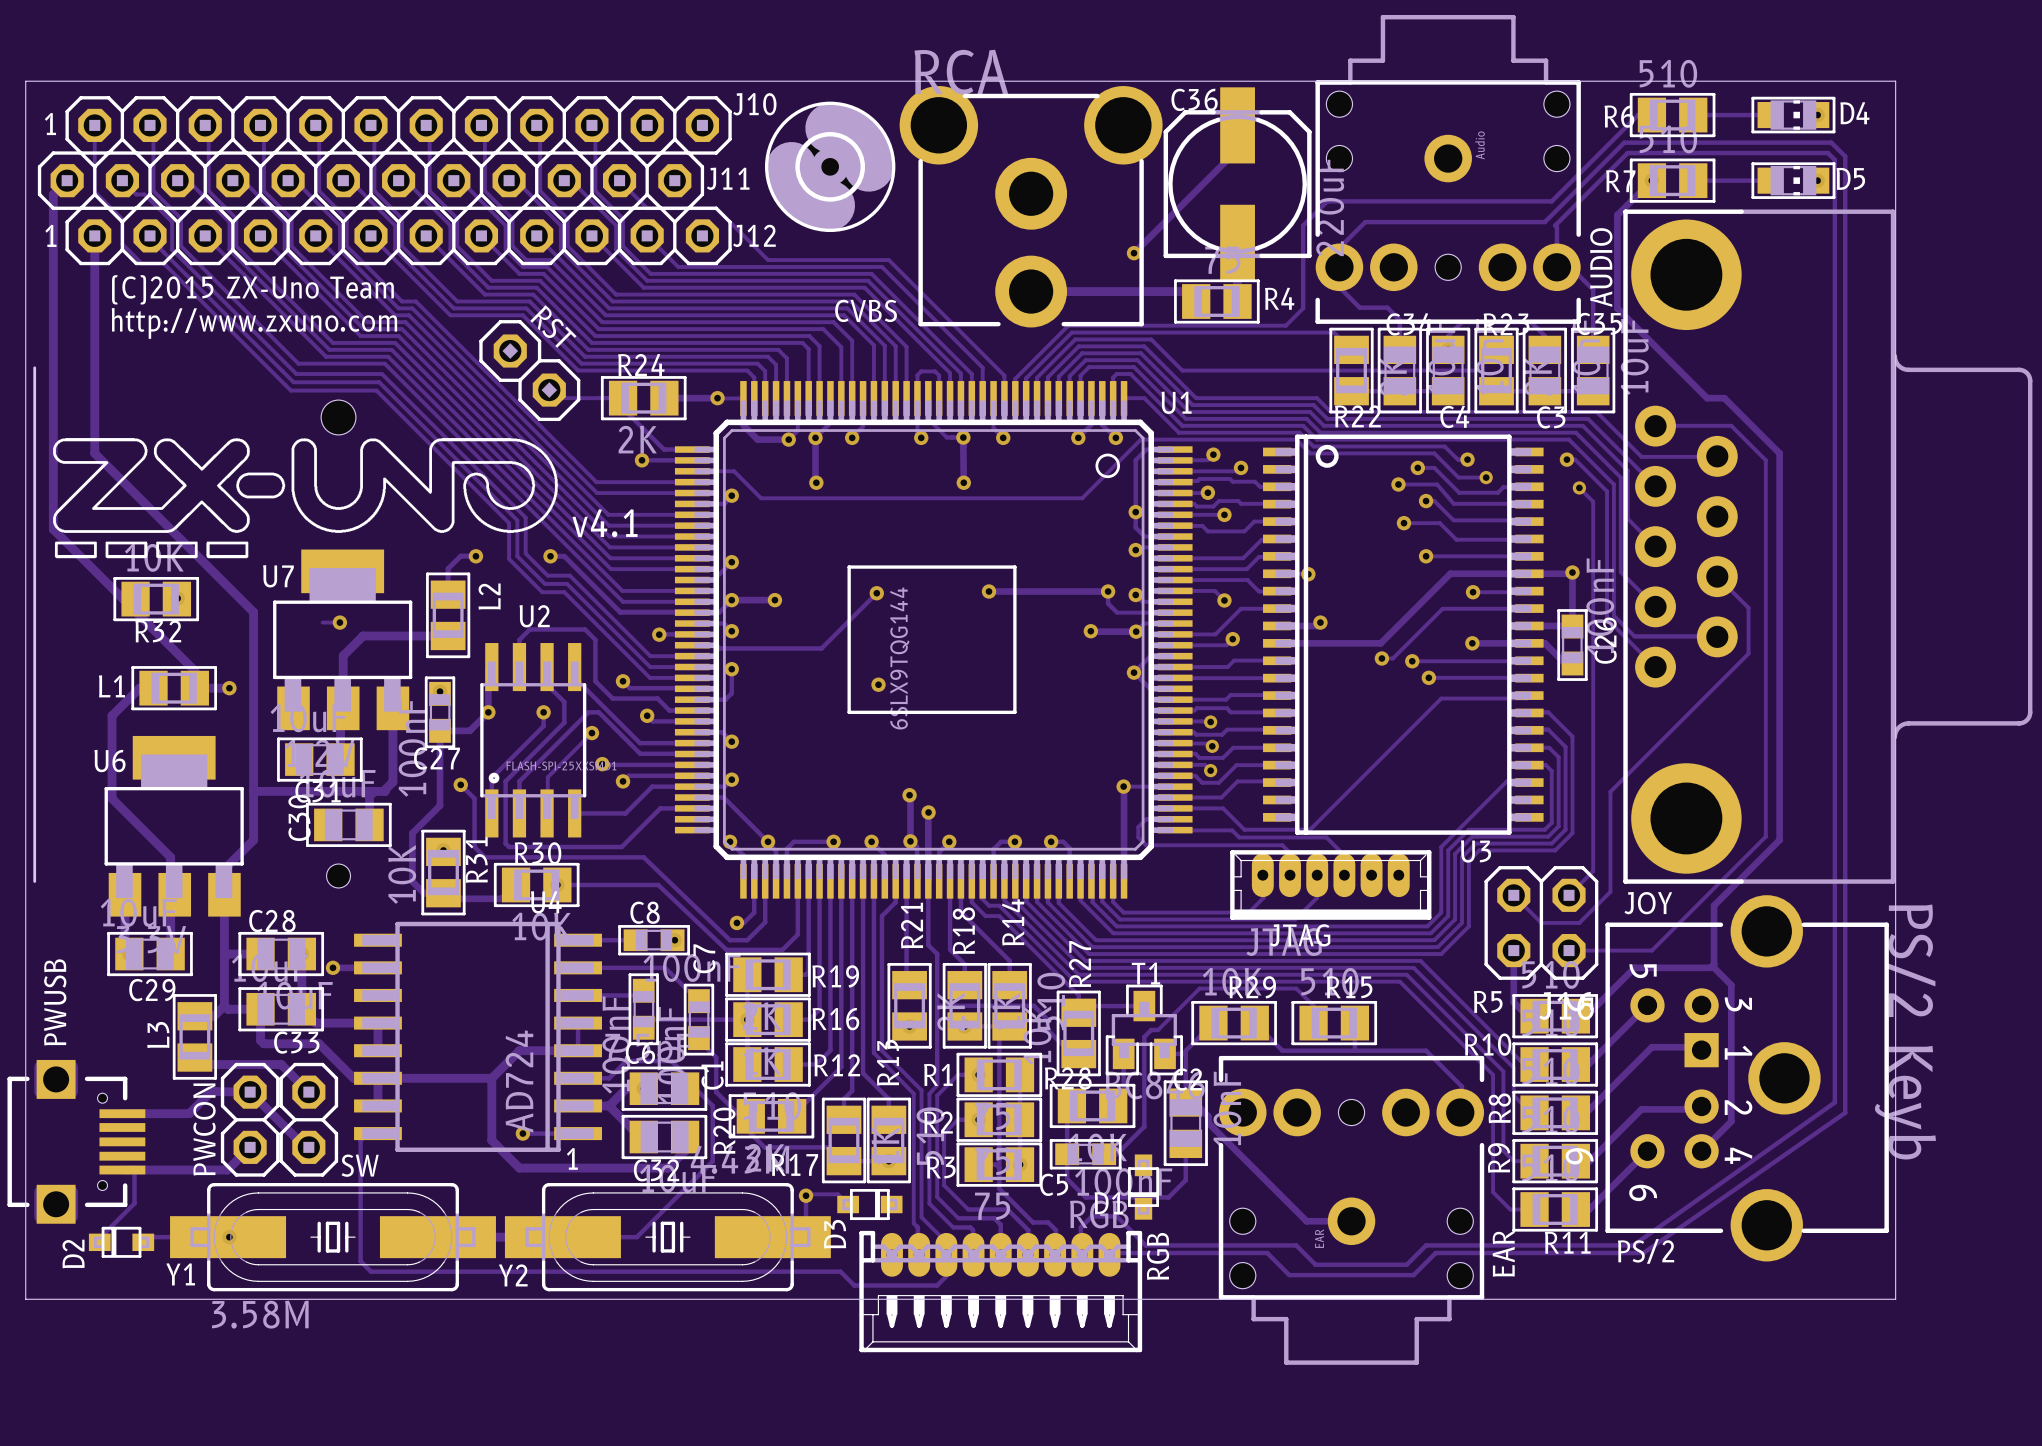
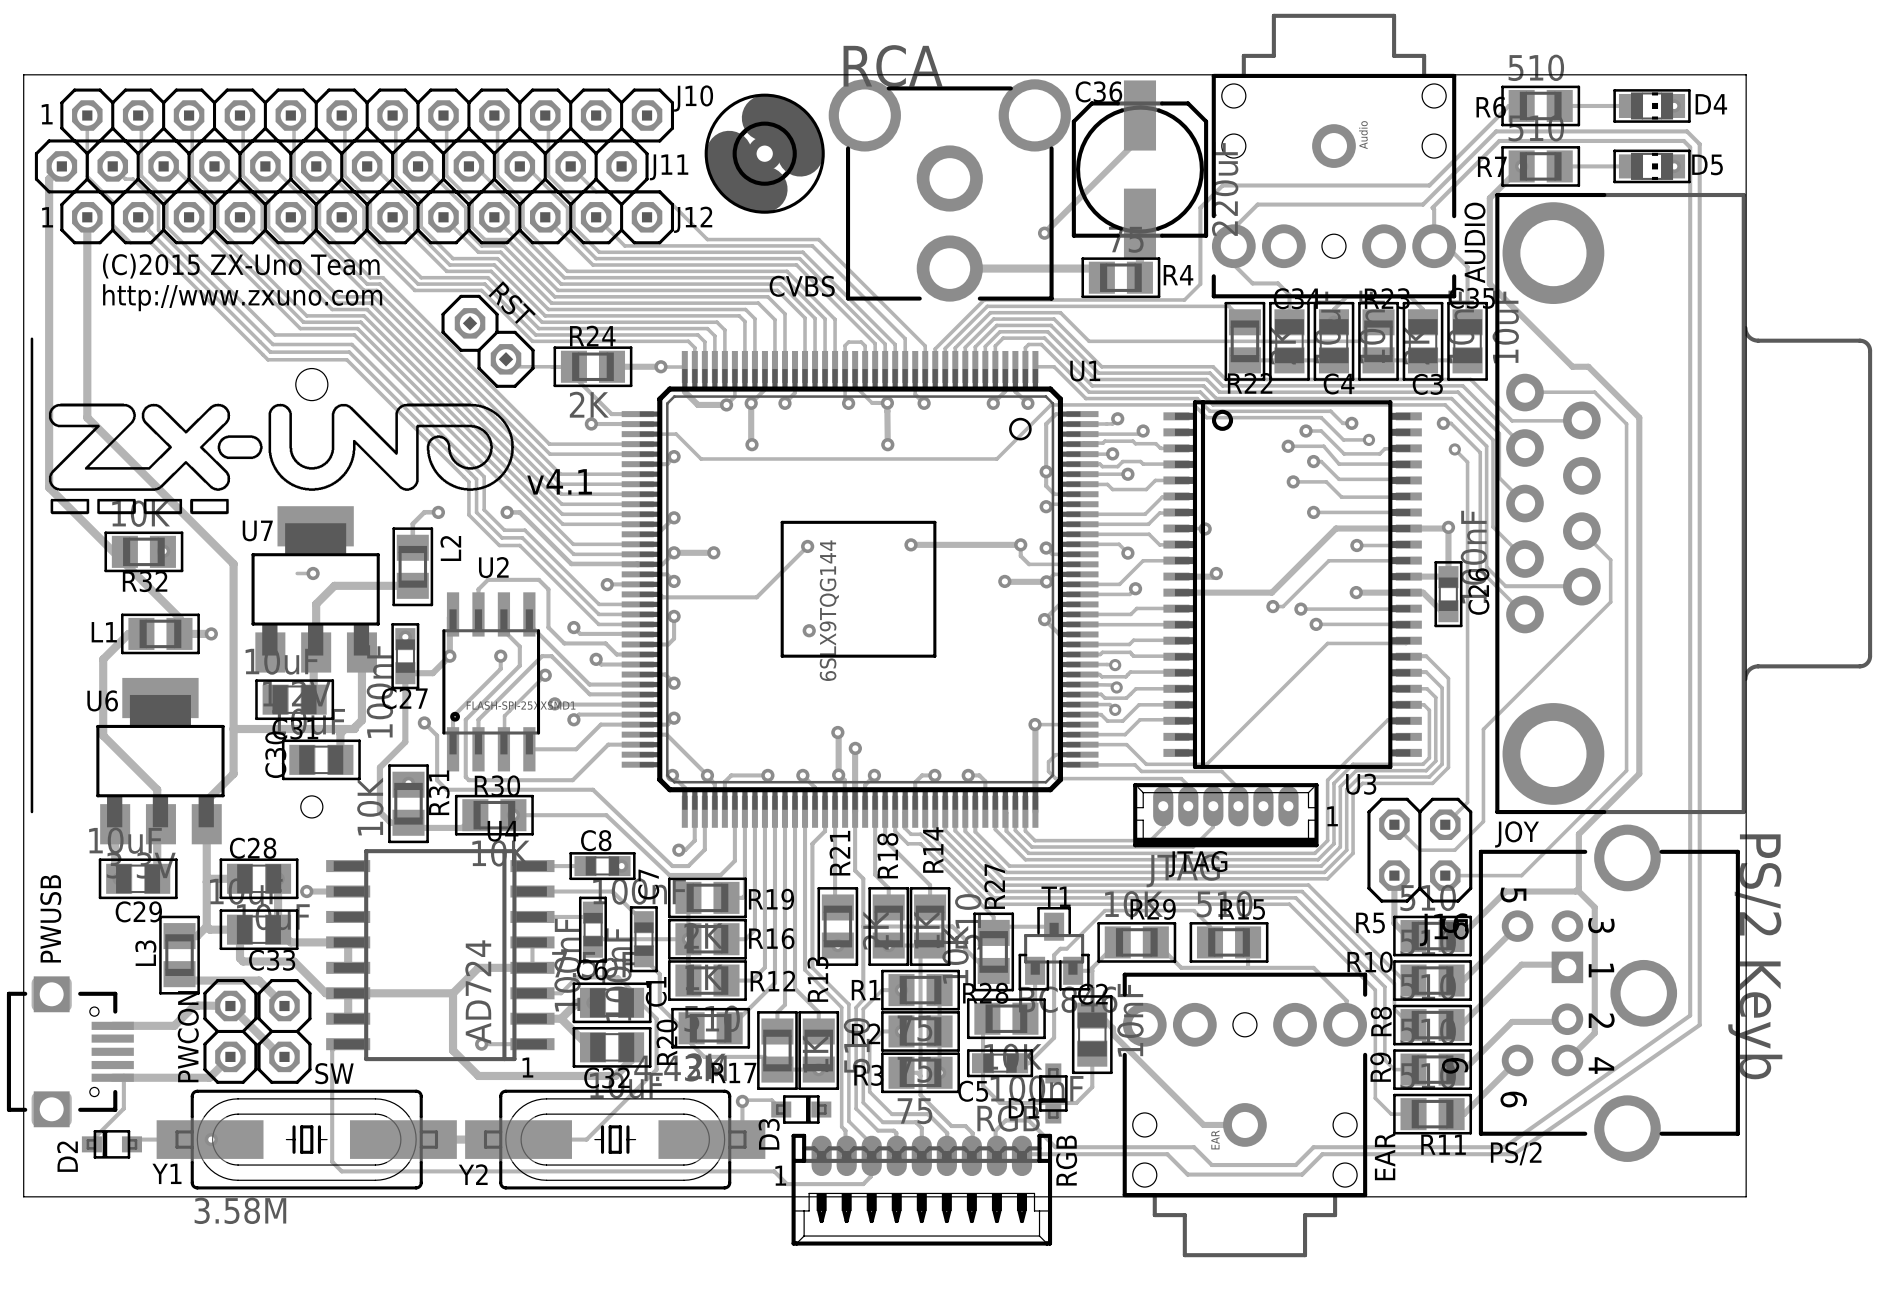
text: none -> 1 (1332, 816)
text: none -> 1 (780, 1175)

